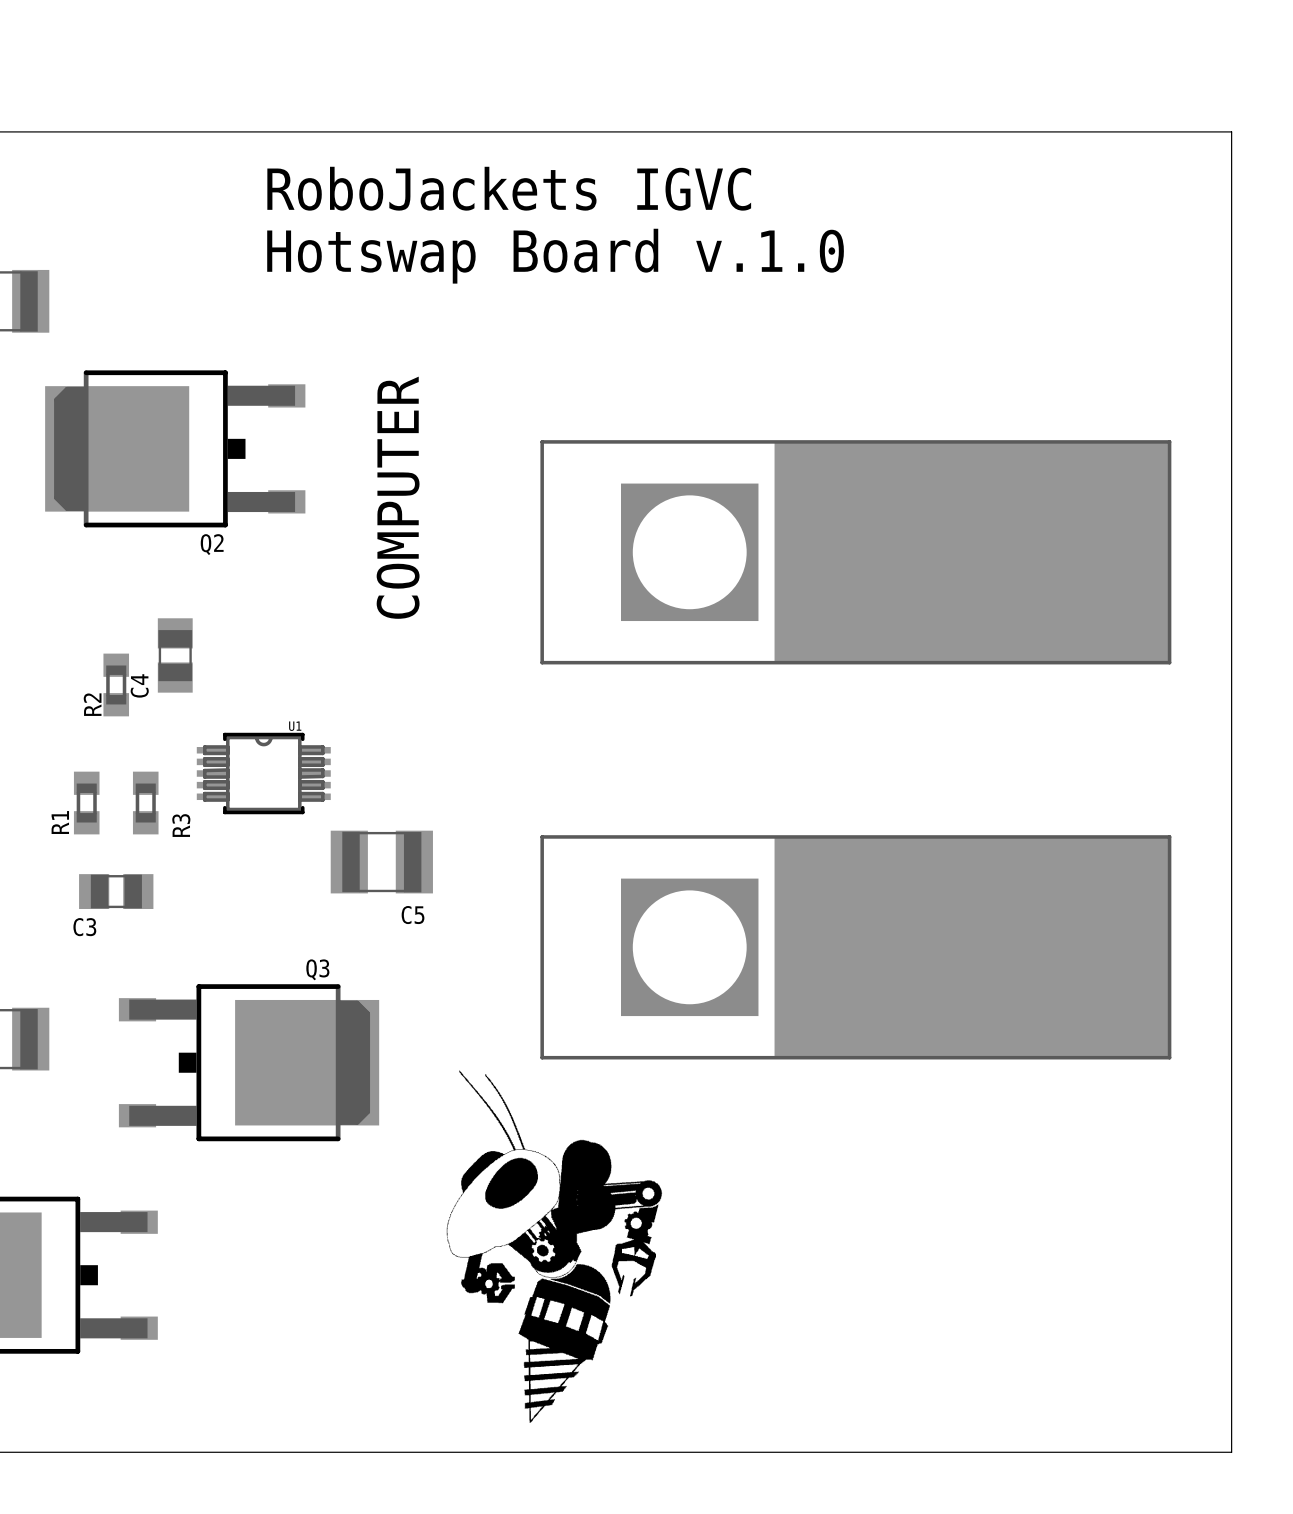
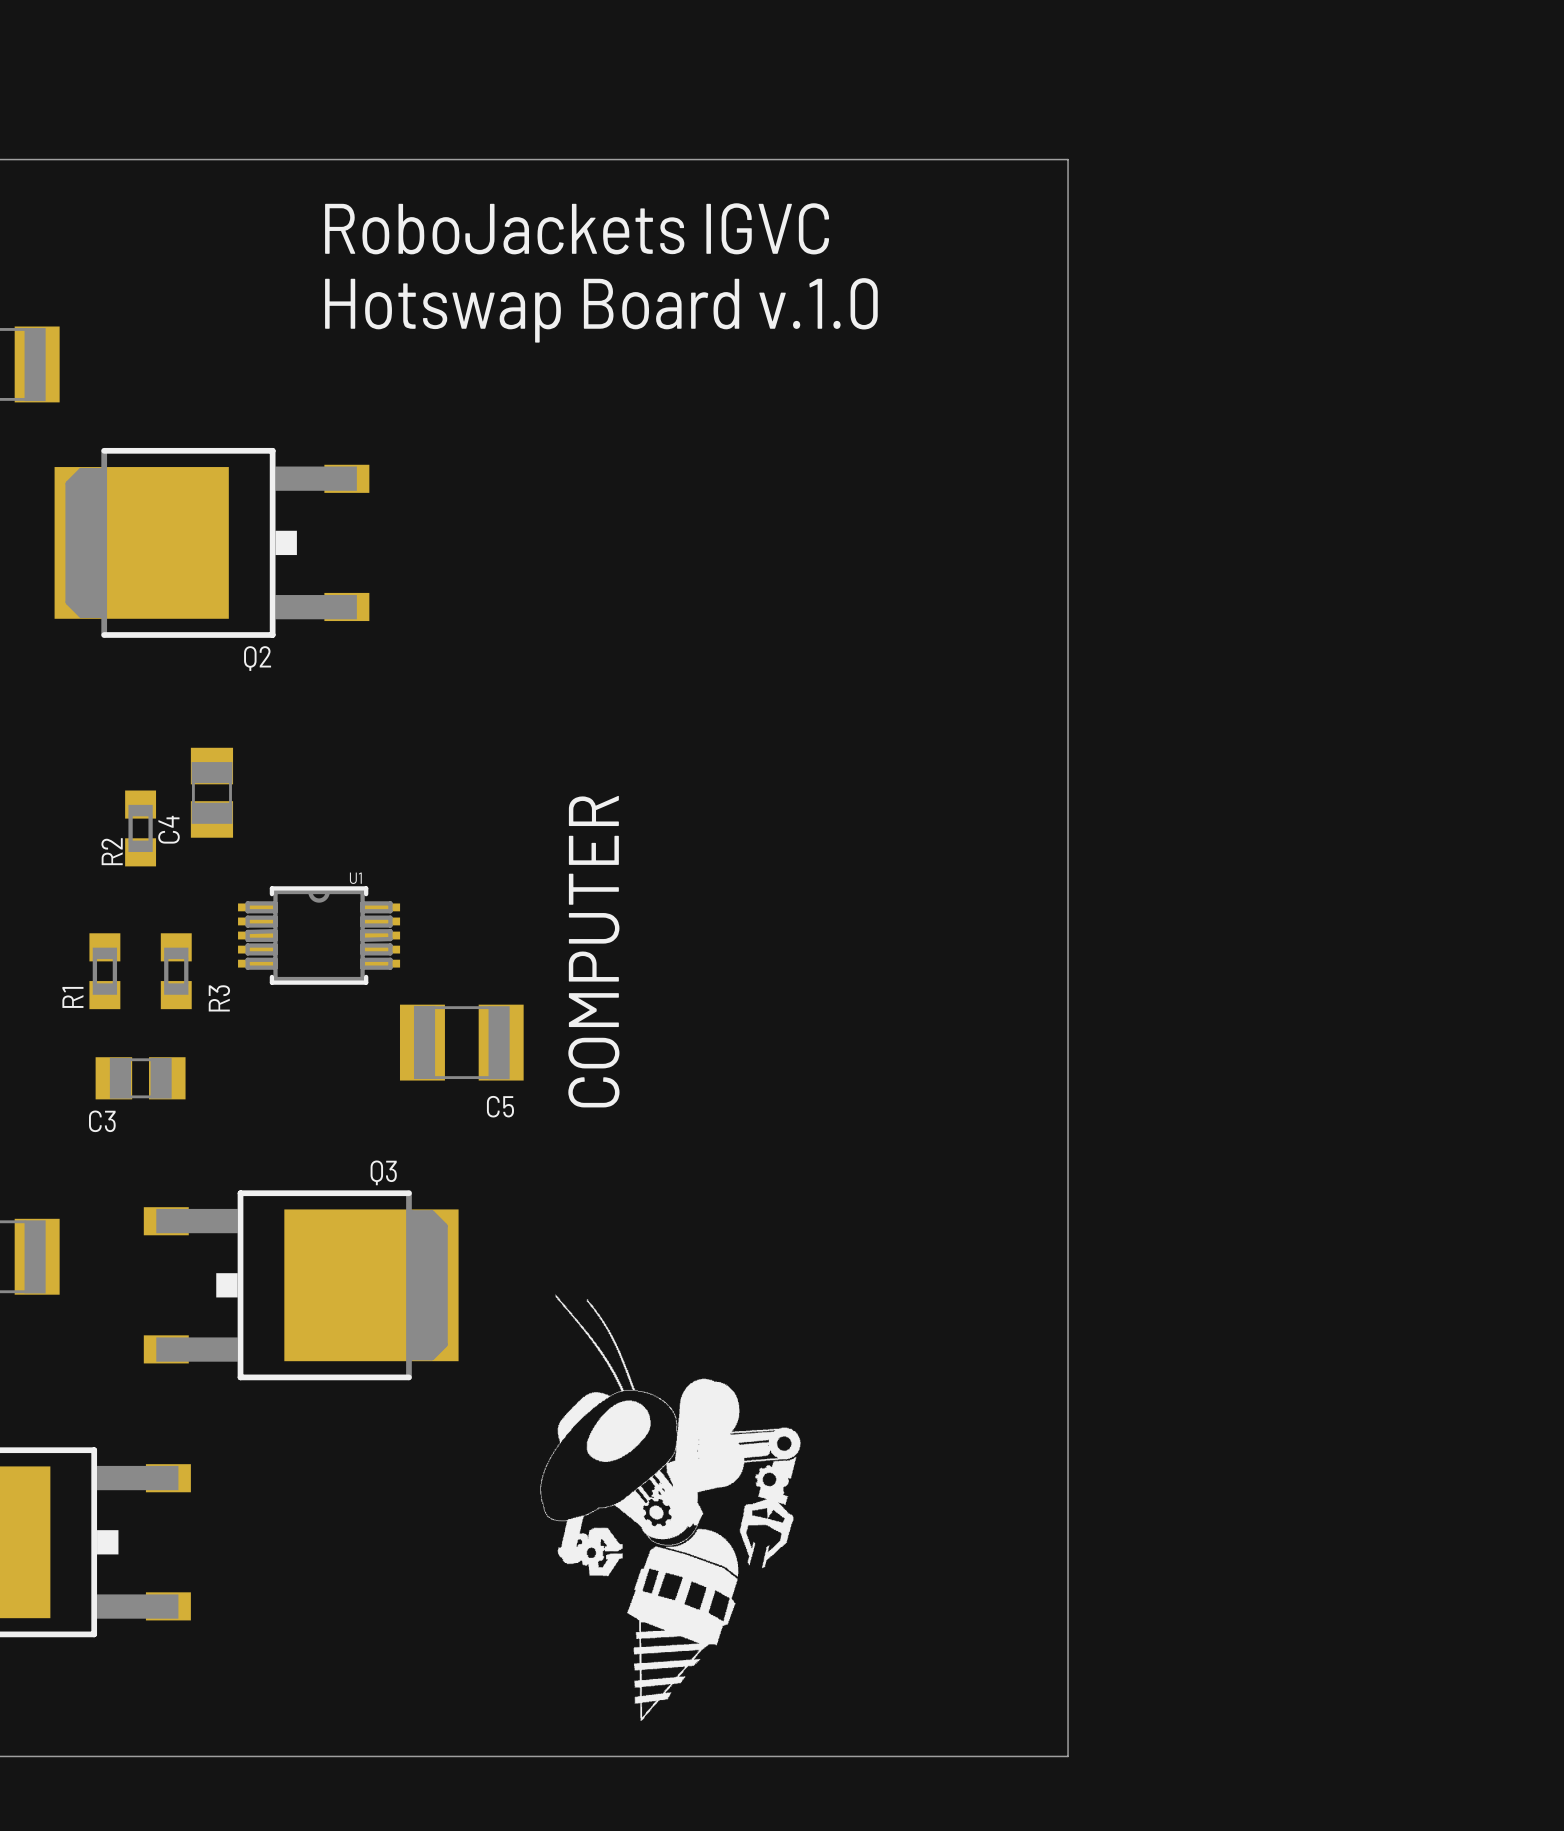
board edge: (883, 131) (1231, 131) (1231, 1452) (883, 1452) -> (1068, 159) (1068, 1756)
text position: COMPUTER (398, 497) -> COMPUTER (593, 951)
part: (855, 552) -> none
part: (855, 947) -> none

